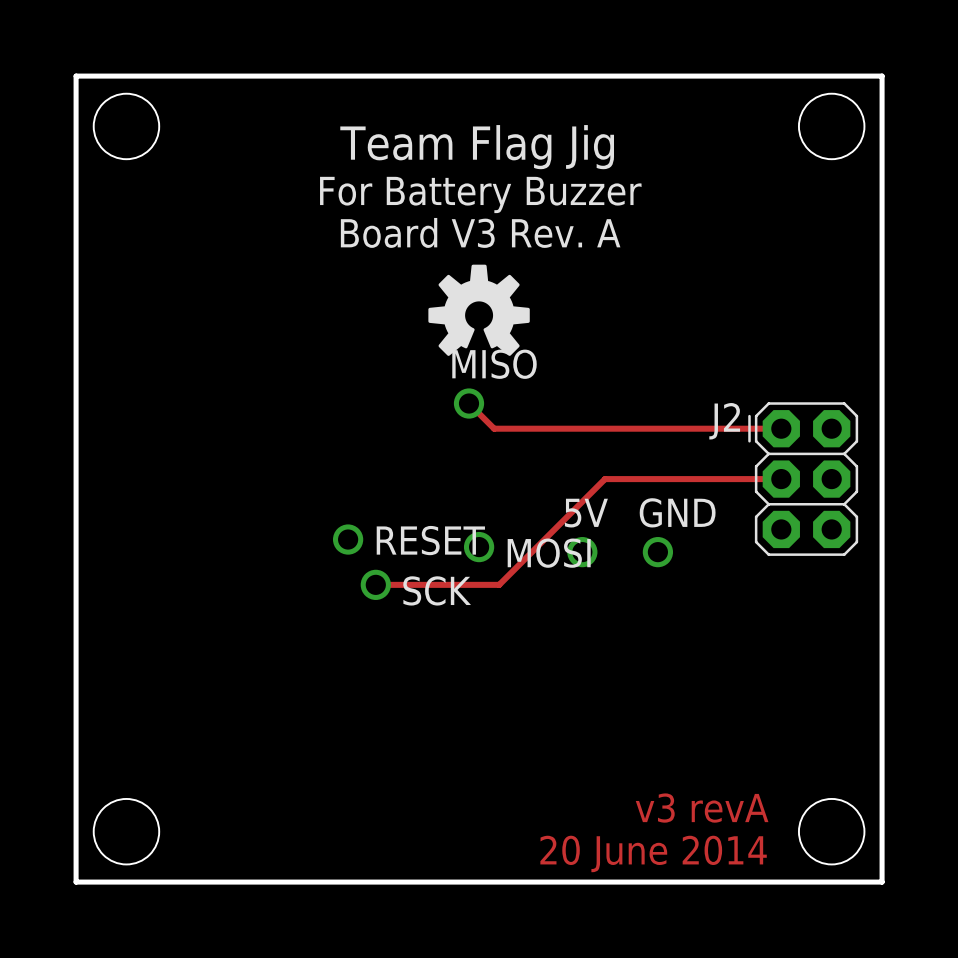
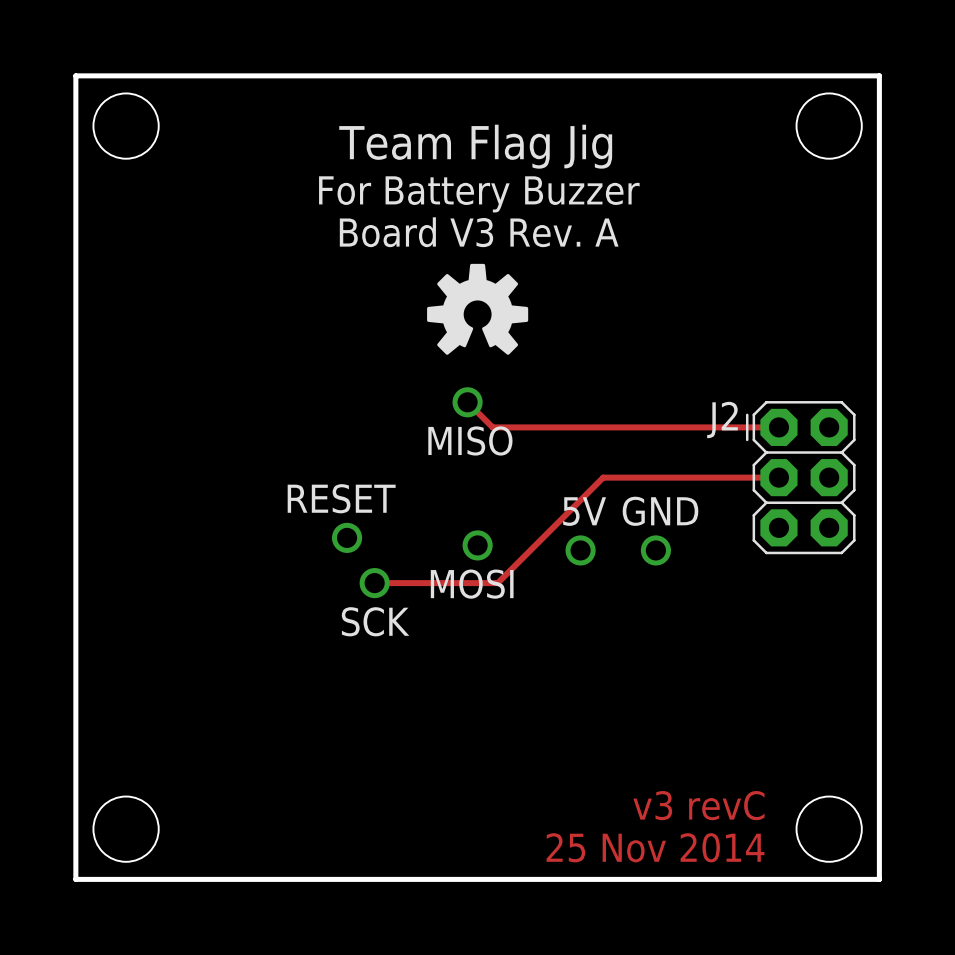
MISO name position: MISO (494, 364) -> MISO (470, 440)
GND name position: GND (677, 512) -> GND (660, 511)
RESET name position: RESET (430, 540) -> RESET (341, 498)
MOSI name position: MOSI (549, 553) -> MOSI (472, 584)
SCK name position: SCK (437, 590) -> SCK (375, 621)
text: v3 revA (702, 808) -> v3 revC (698, 805)
text: 20 June 2014 (653, 853) -> 25 Nov 2014 (655, 847)

